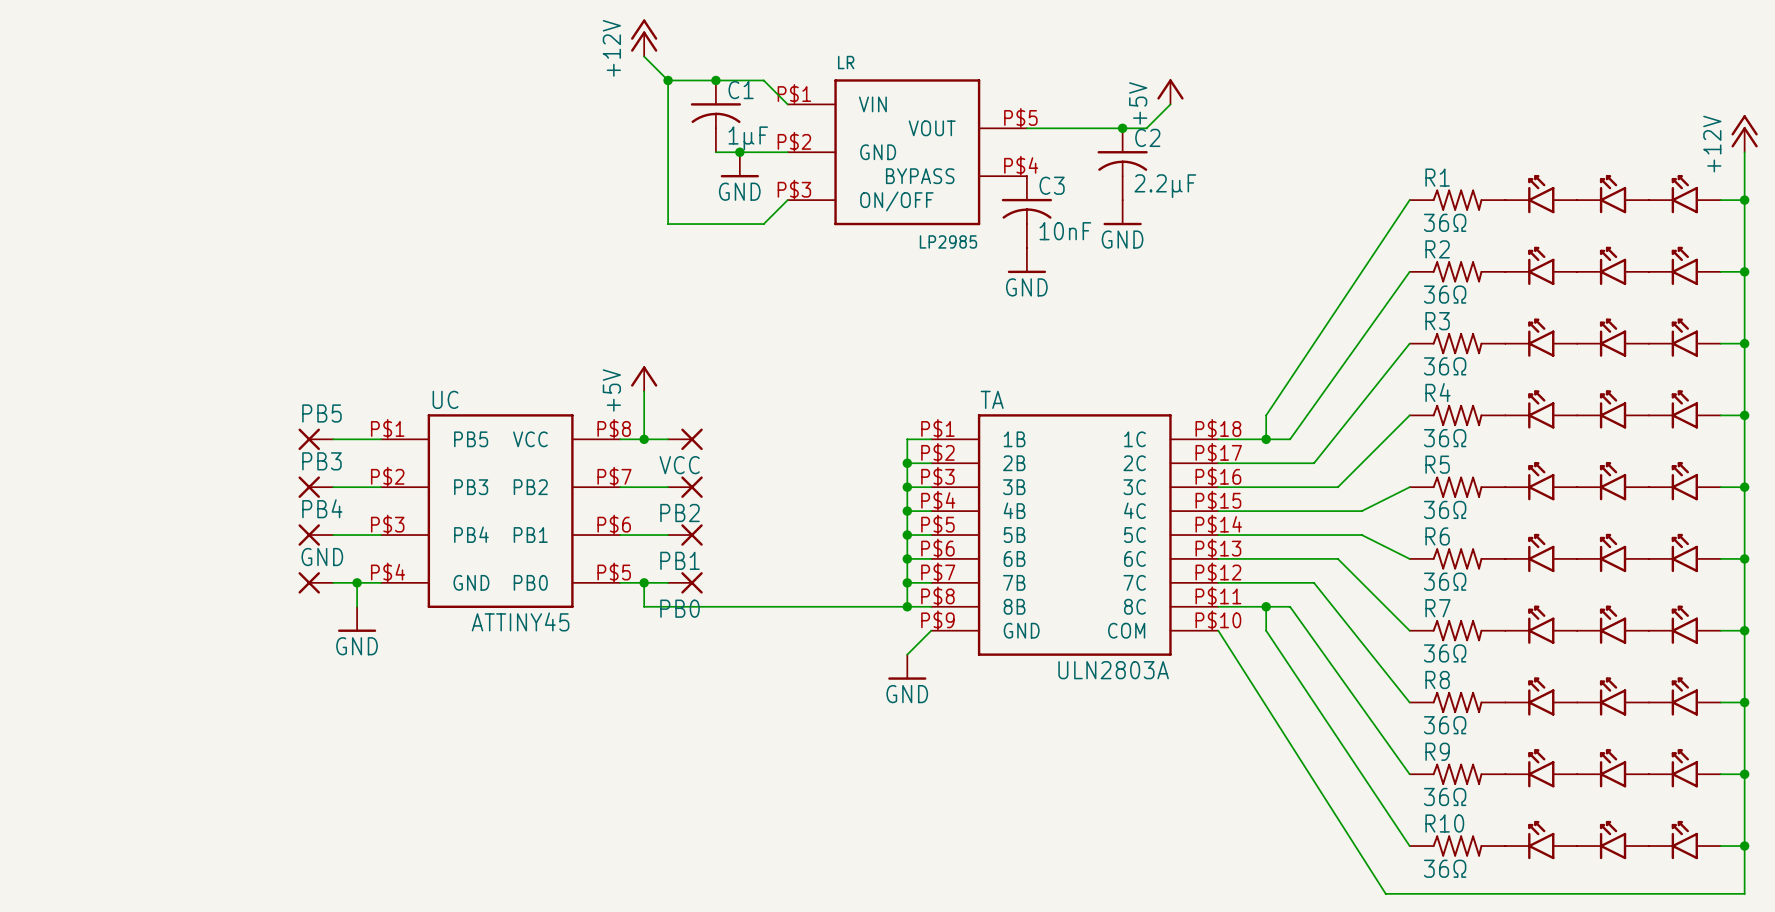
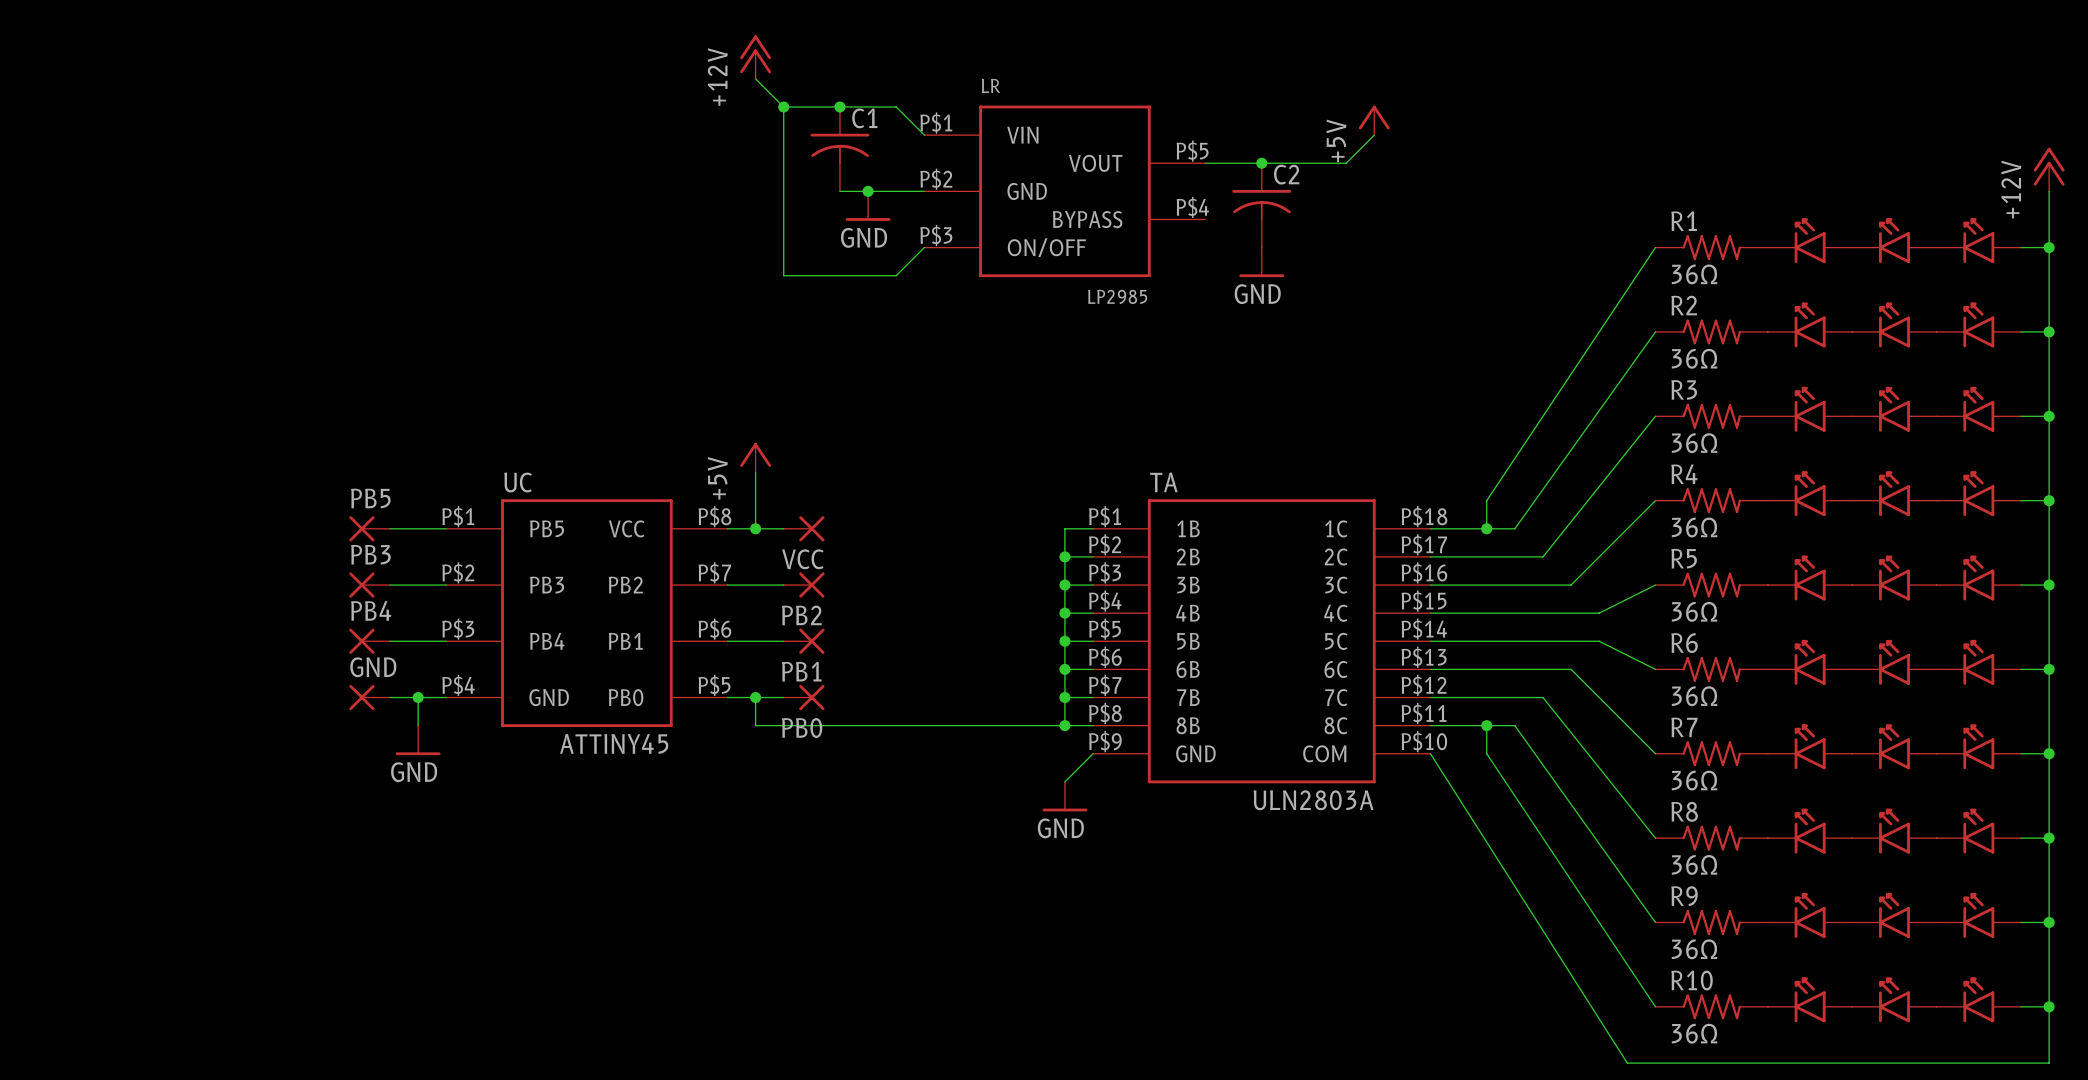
junction position: (1122, 128) -> (1261, 163)
C1 value: 1µF (748, 138) -> none
C2 position: (1122, 164) -> (1261, 205)
C2 value: 2.2µF (1165, 186) -> none
C3: 10nF (1026, 212) -> none
power symbol: none -> GND (1261, 262)
power symbol: GND (1122, 212) -> none
power symbol: GND (1026, 260) -> none

